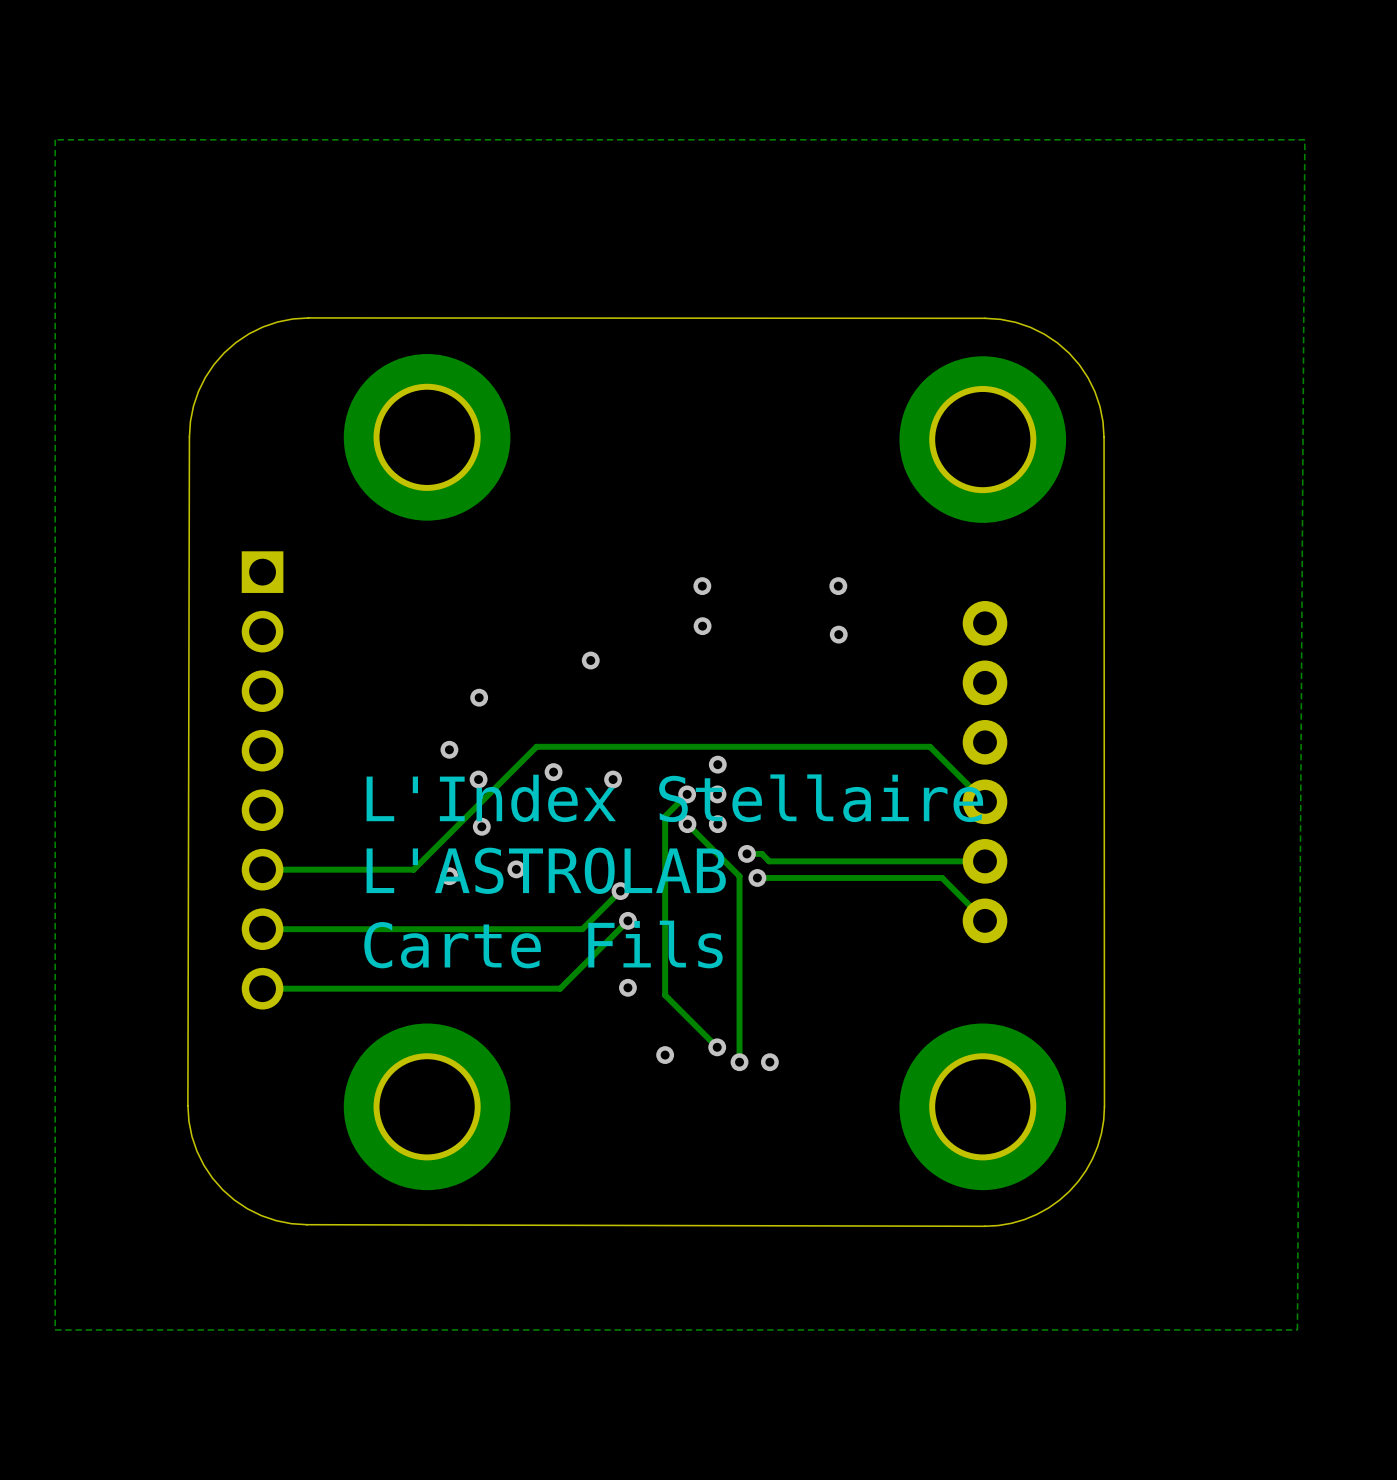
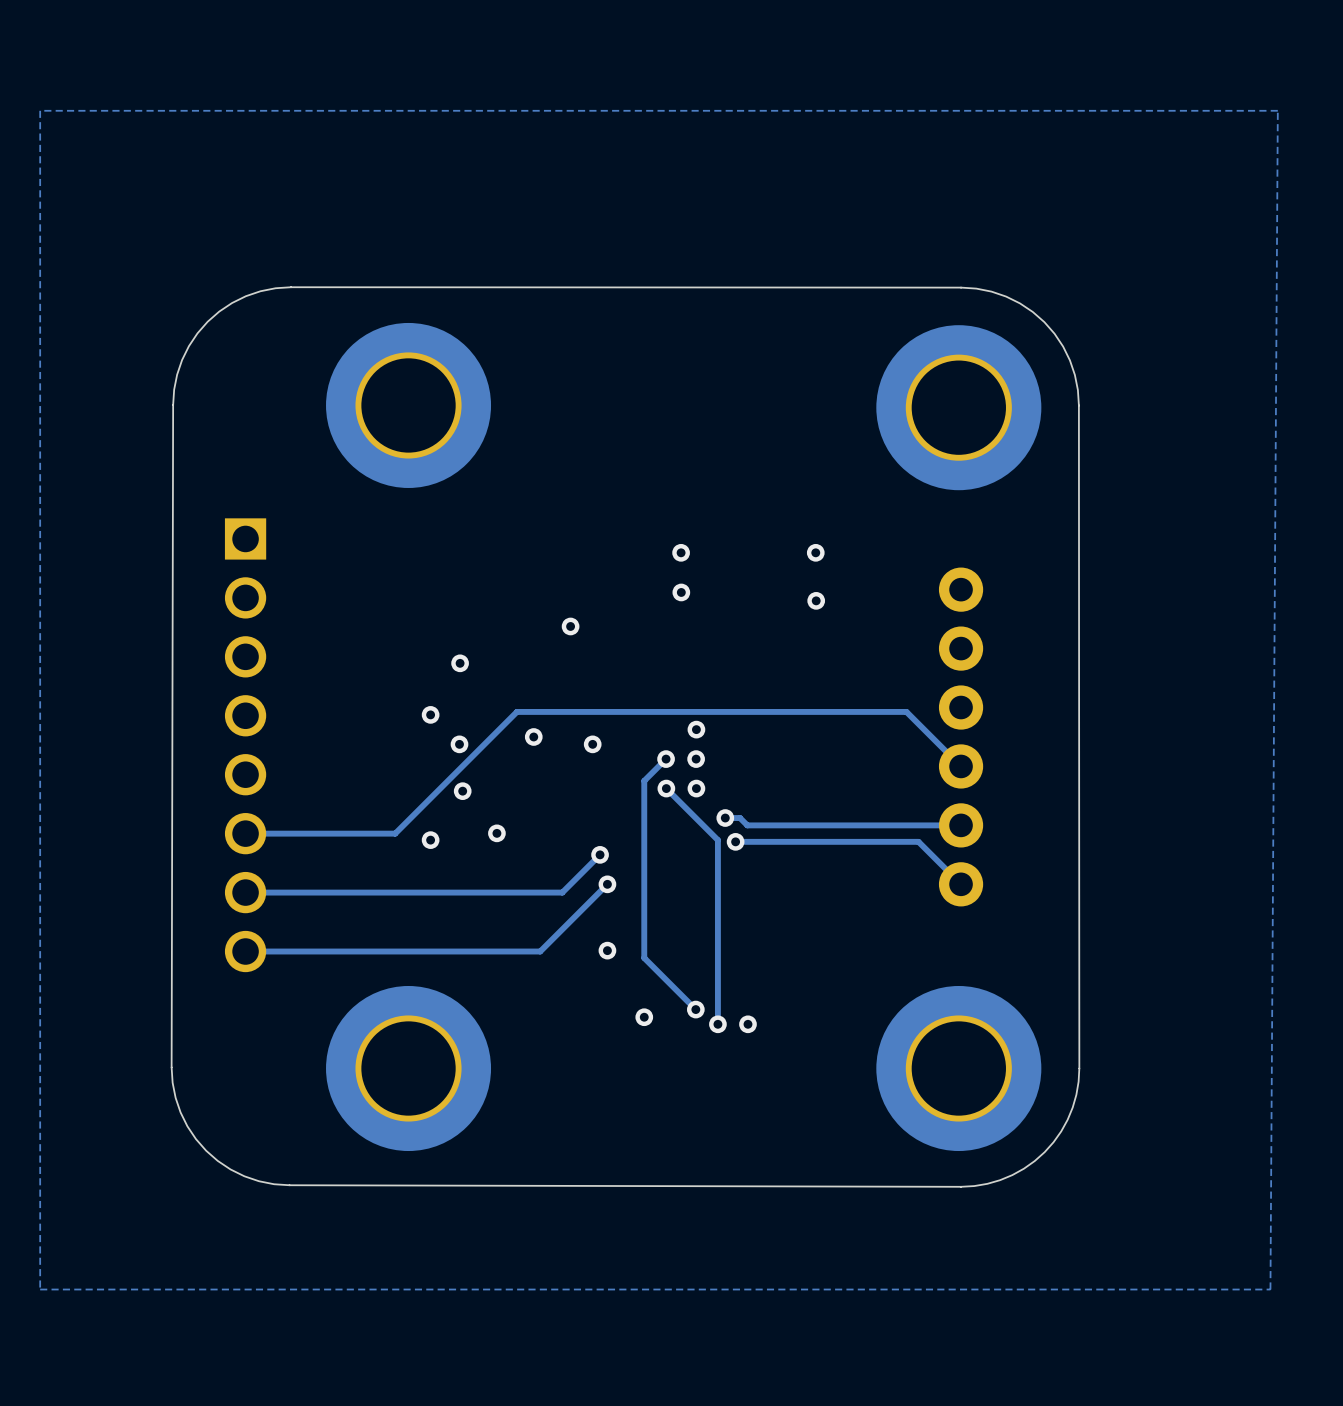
text: L'Index Stellaire (674, 798) -> none
text: L'ASTROLAB (546, 870) -> none
text: Carte Fils (543, 944) -> none

